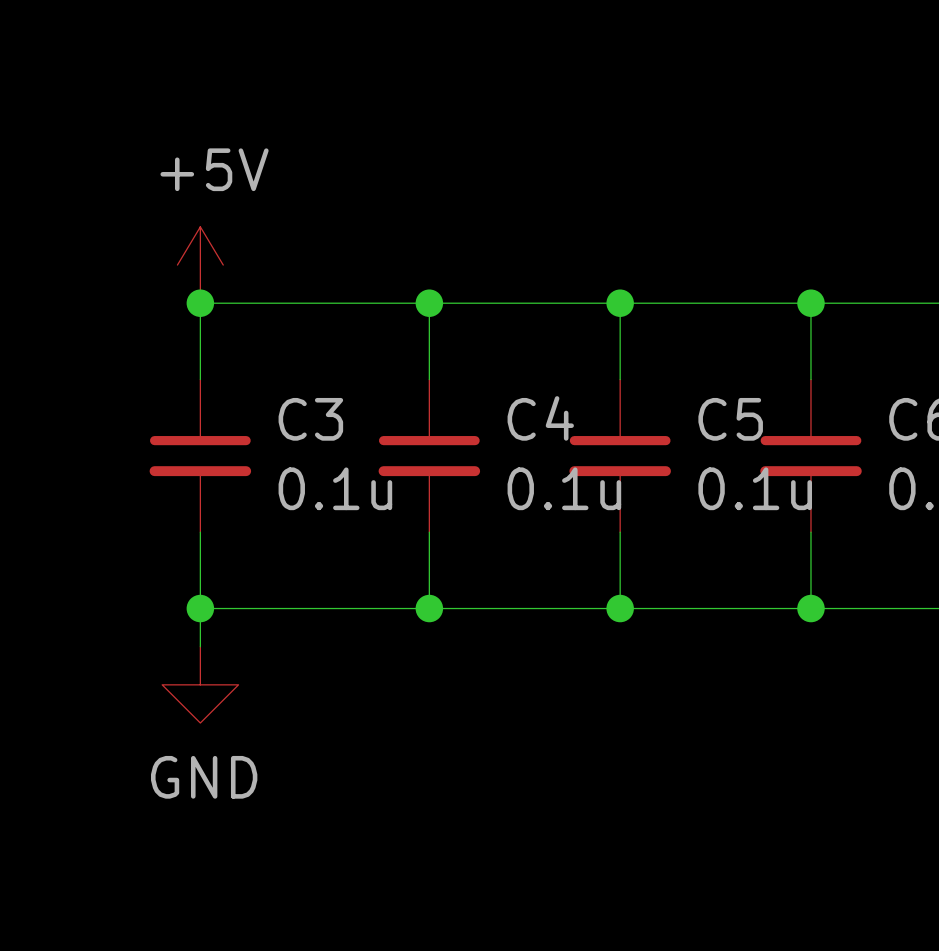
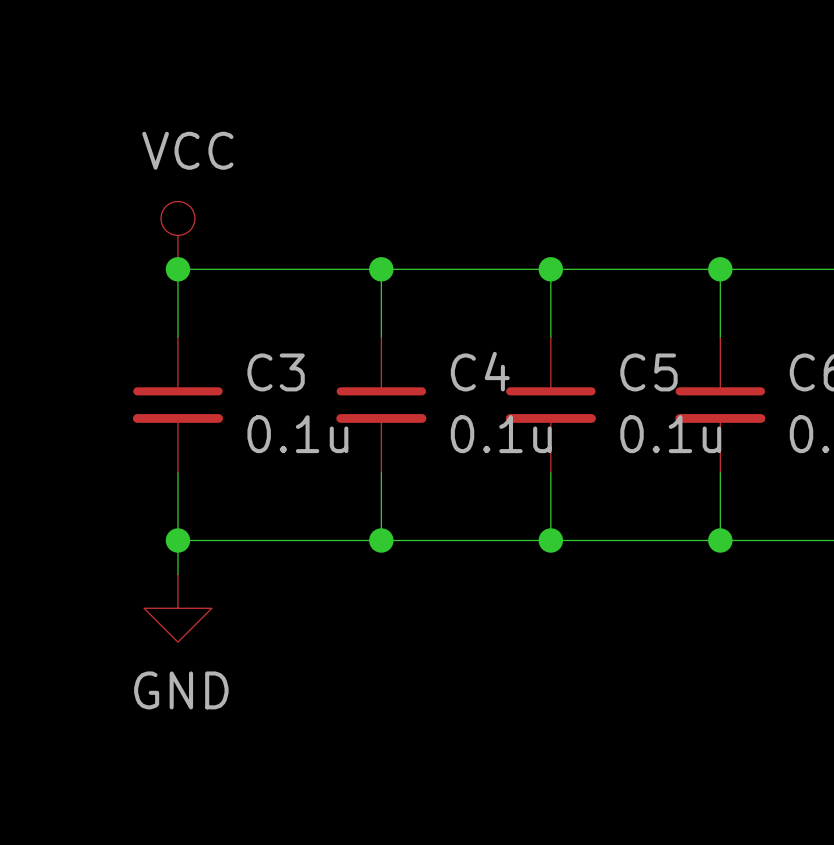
power symbol: +5V (200, 265) -> VCC (177, 235)

